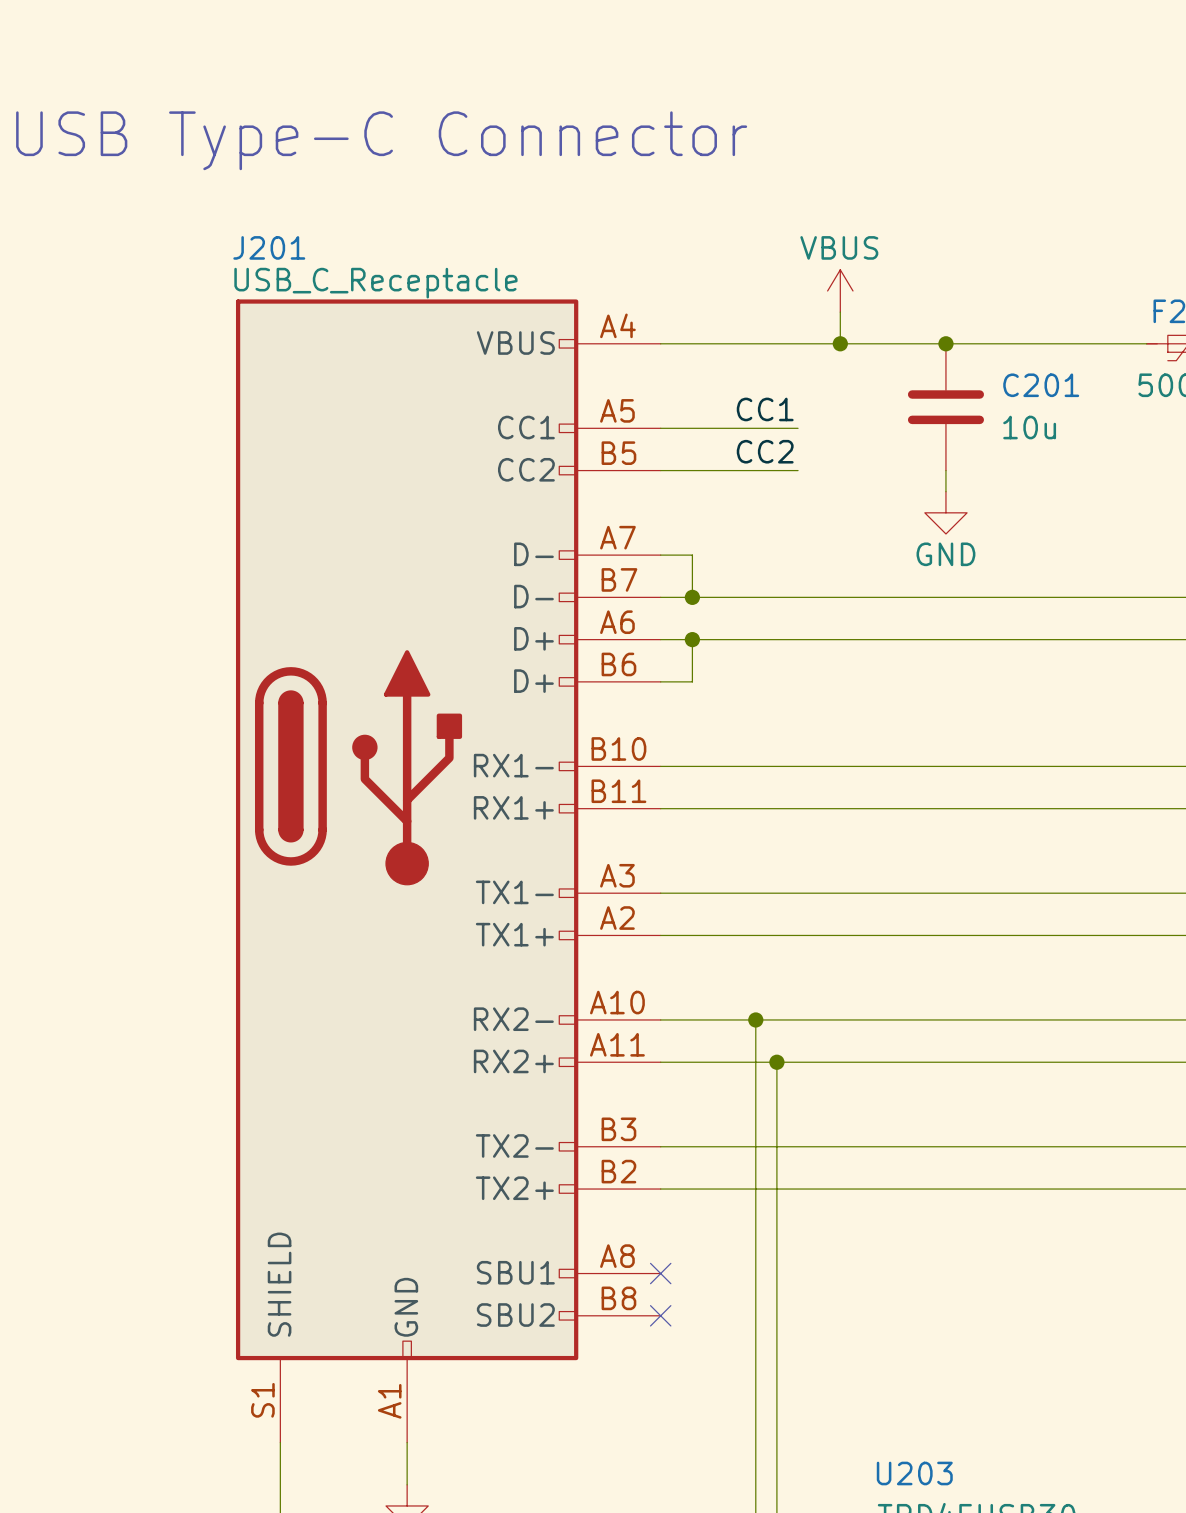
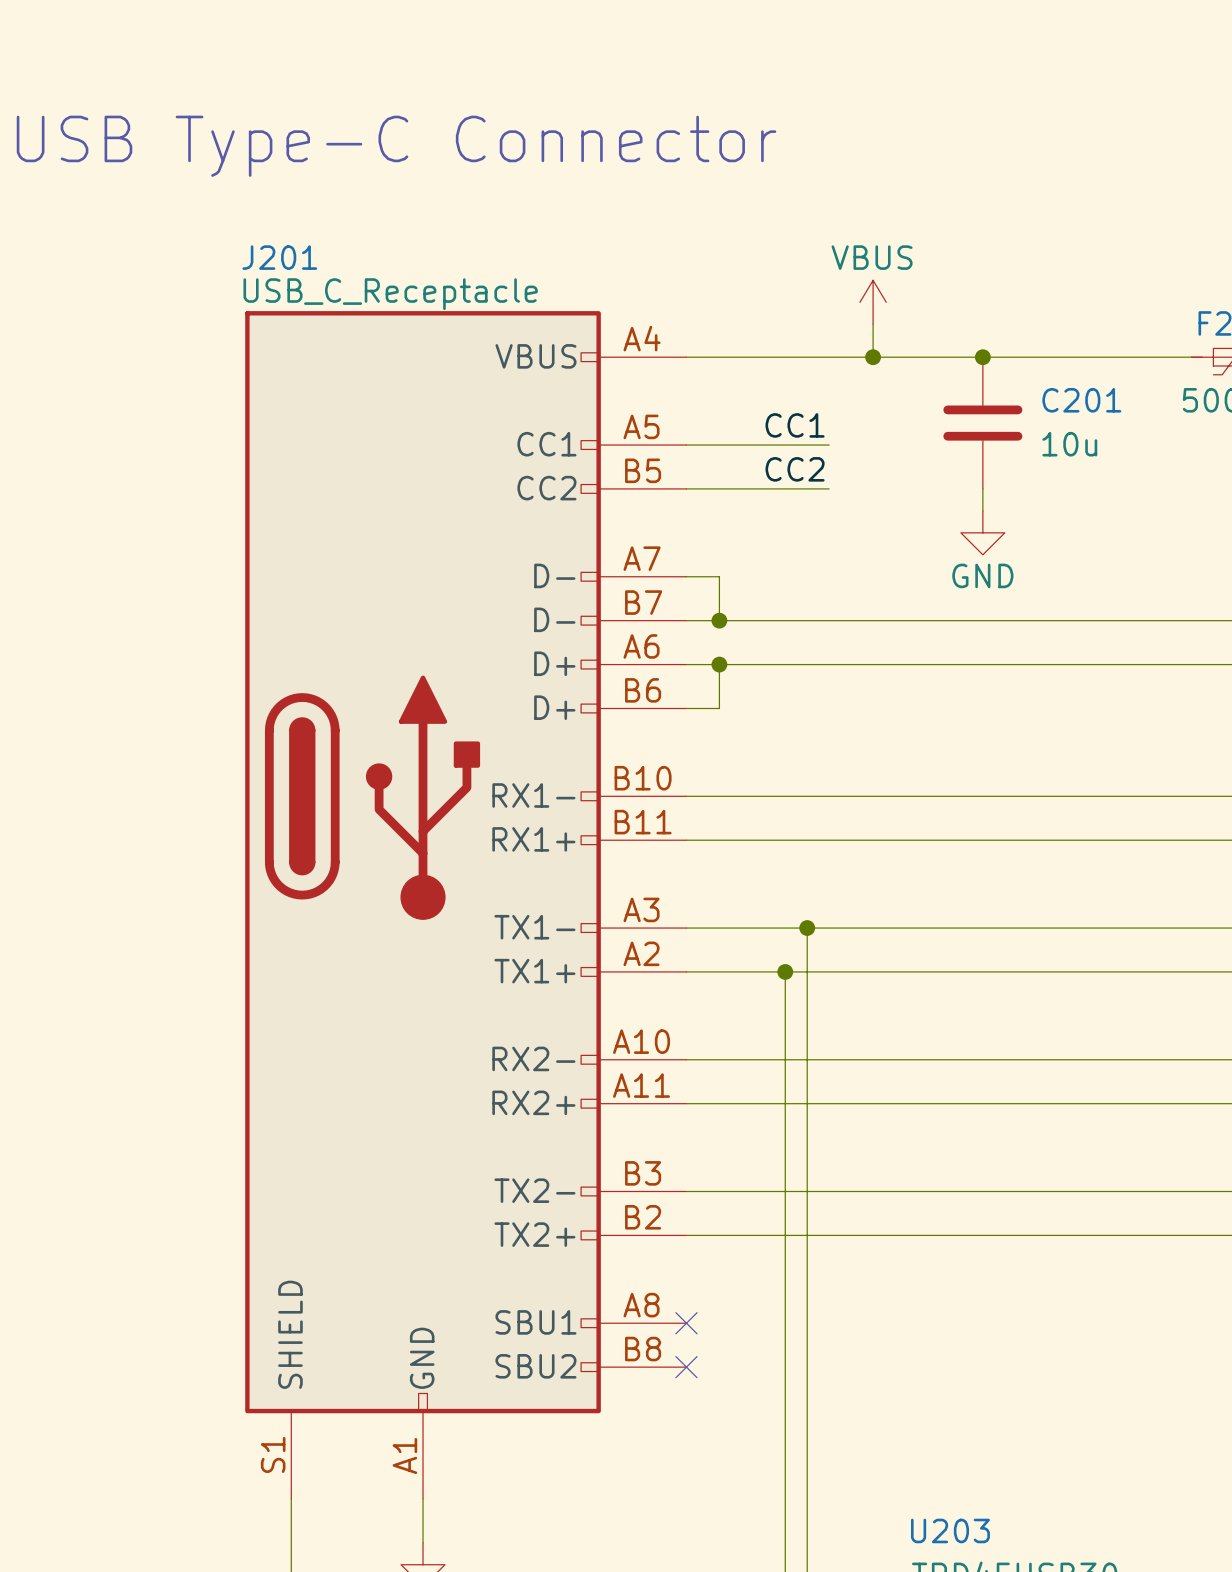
wire: none -> (807, 928) (807, 1103)
junction: none -> (807, 928)
wire: none -> (785, 971) (785, 1059)
junction: none -> (785, 971)
junction: (755, 1019) -> none
junction: (776, 1062) -> none

